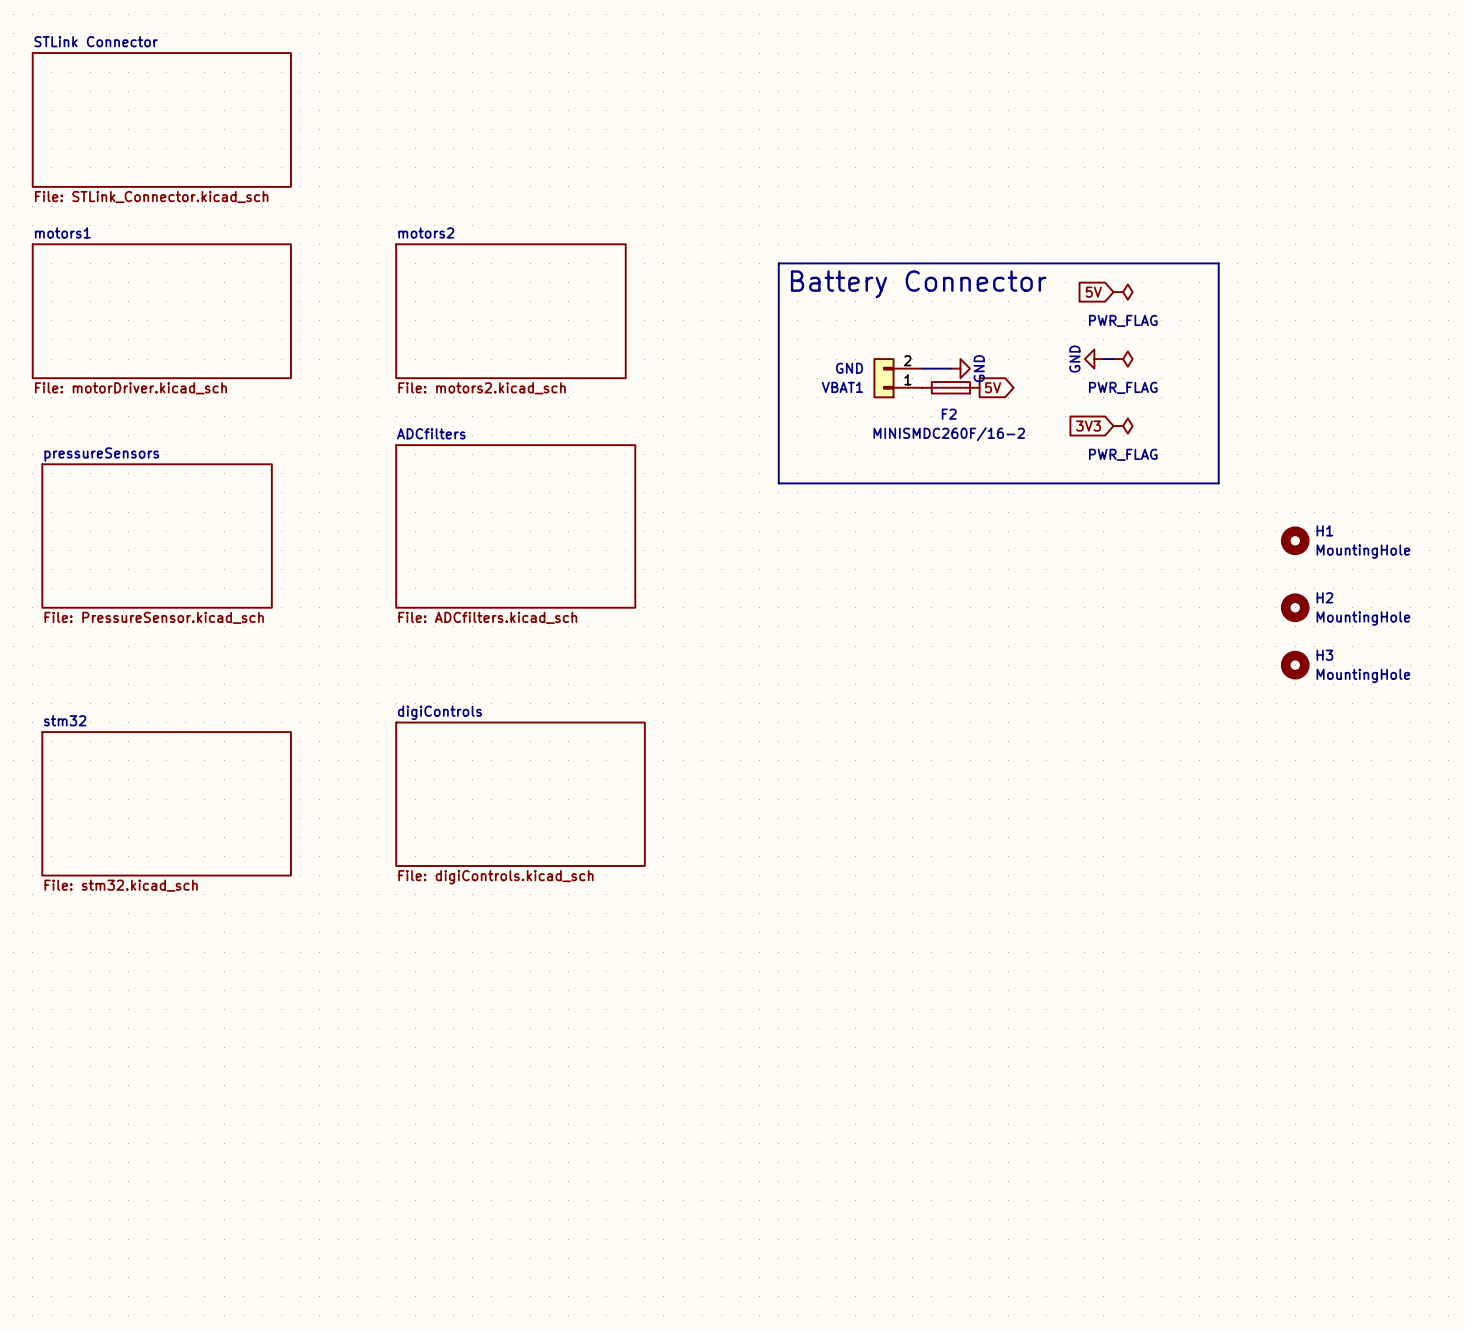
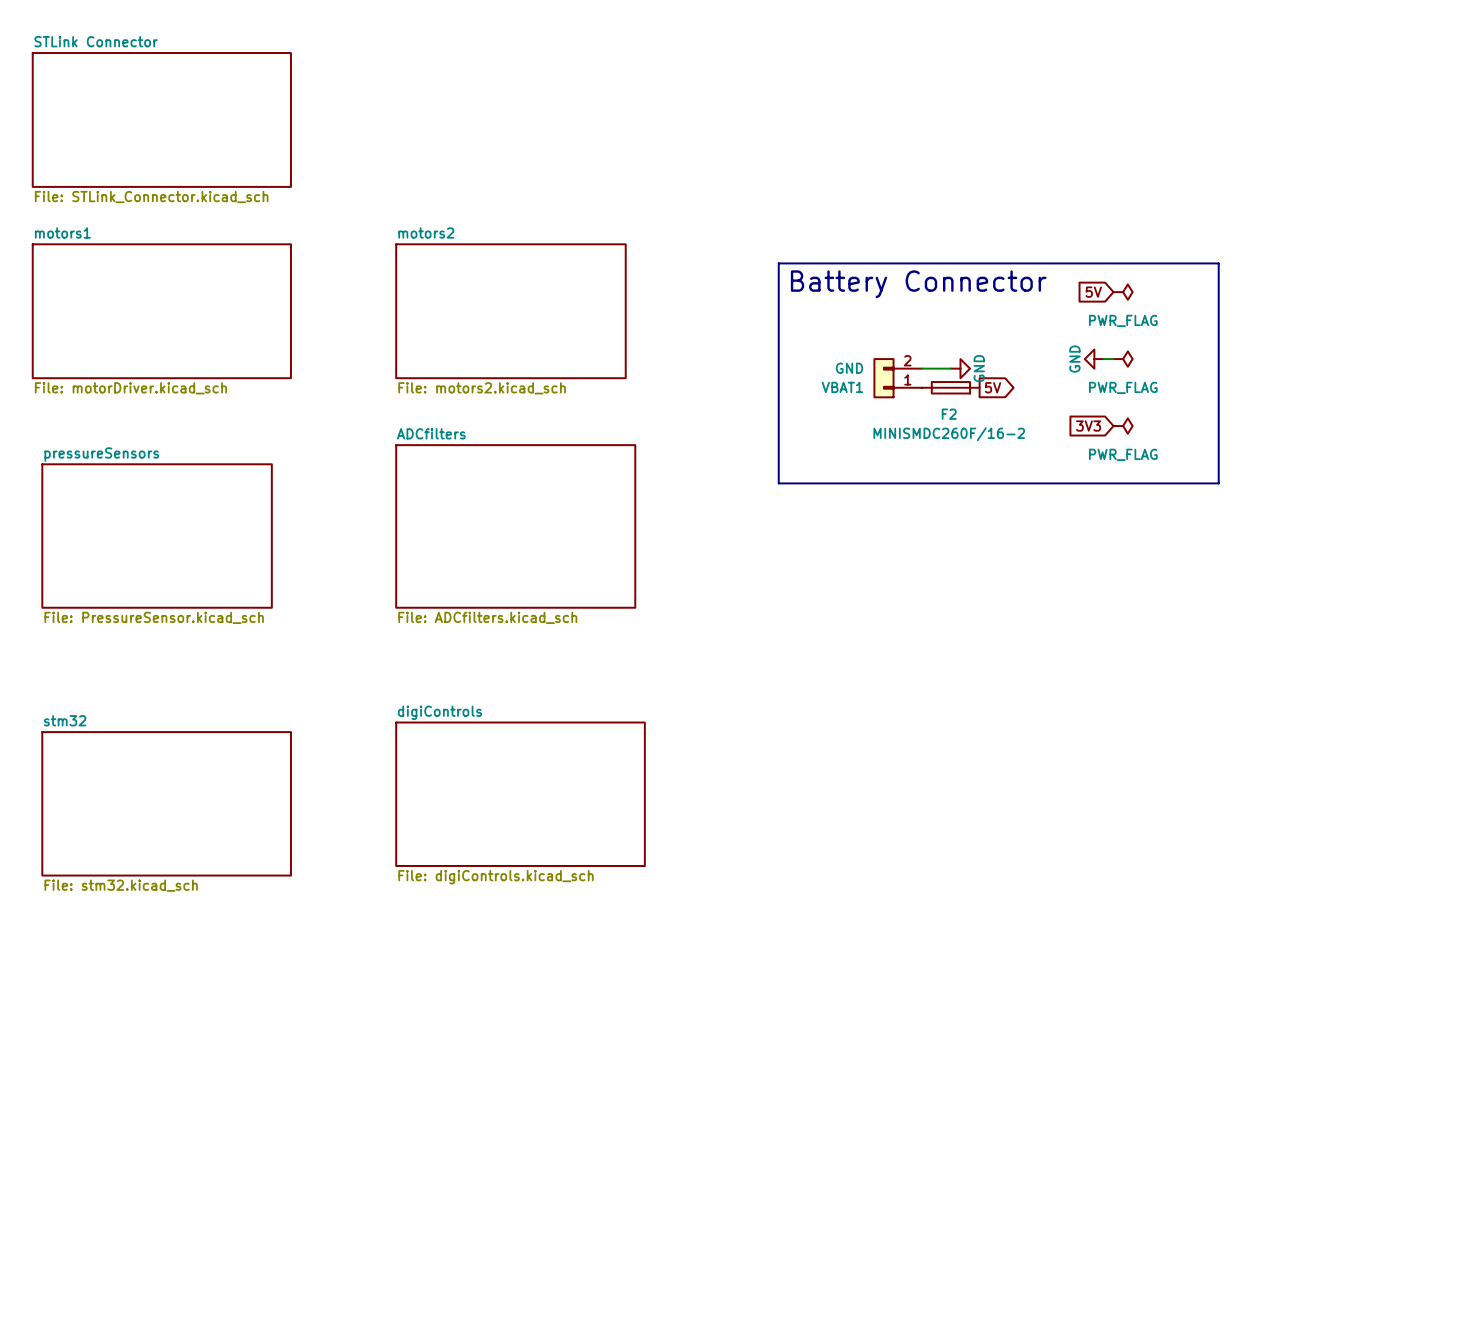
H1: MountingHole (1295, 540) -> none
H2: MountingHole (1295, 607) -> none
H3: MountingHole (1295, 665) -> none

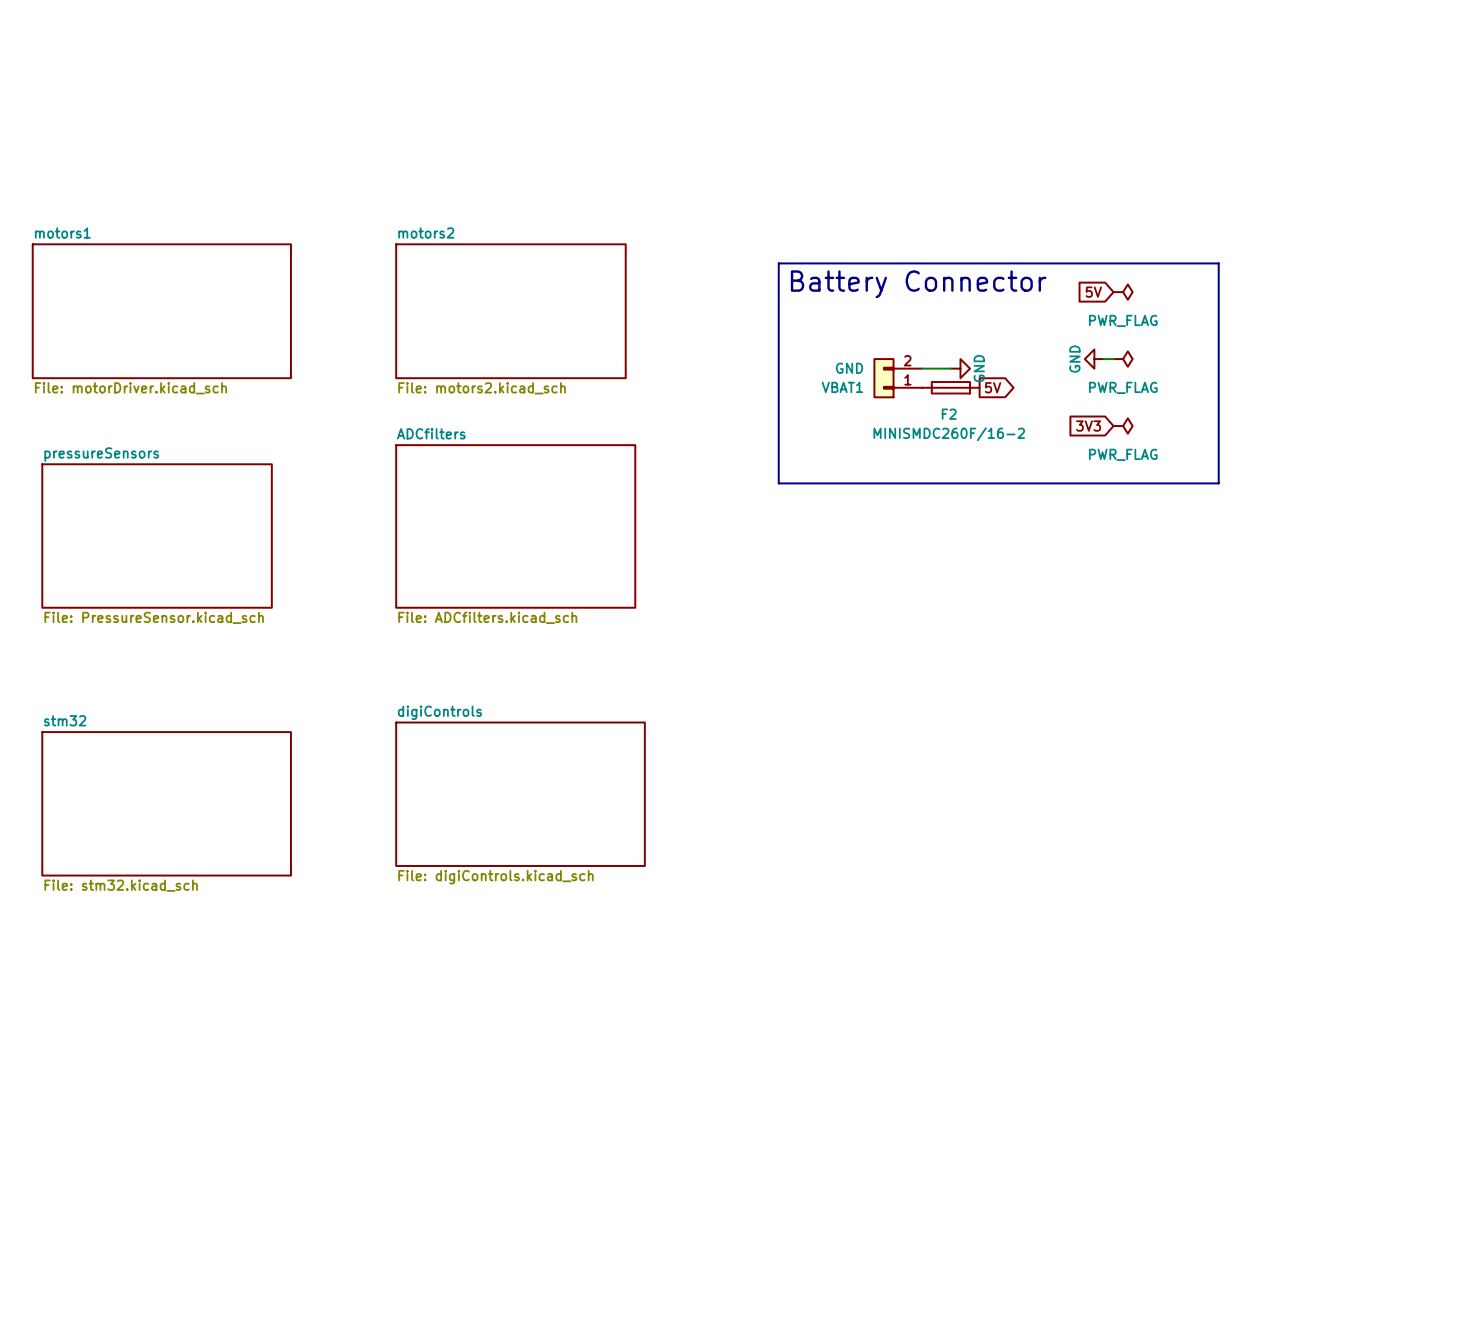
sheet STLink Connector: File: STLink_Connector.kicad_sch (161, 119) -> none

